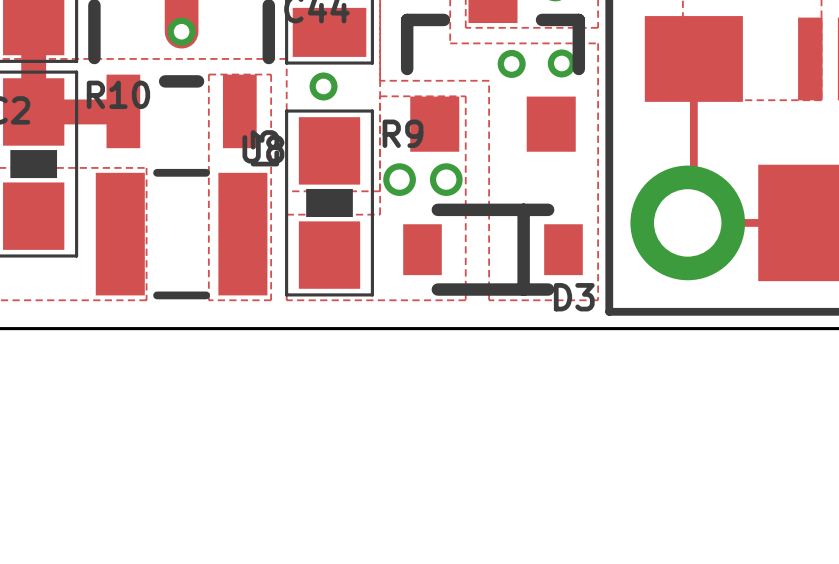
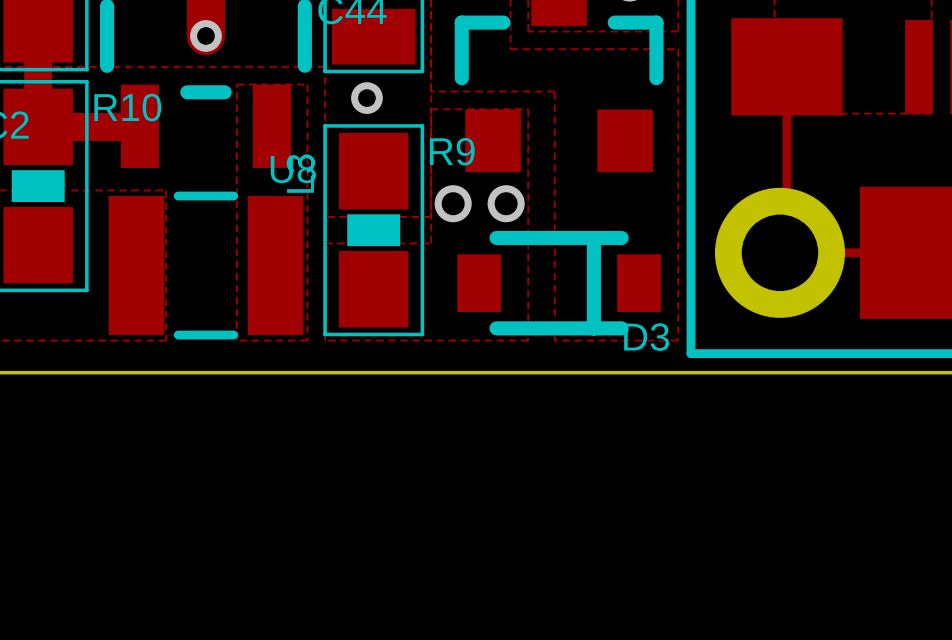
via: (511, 63) -> none
via: (561, 63) -> none

